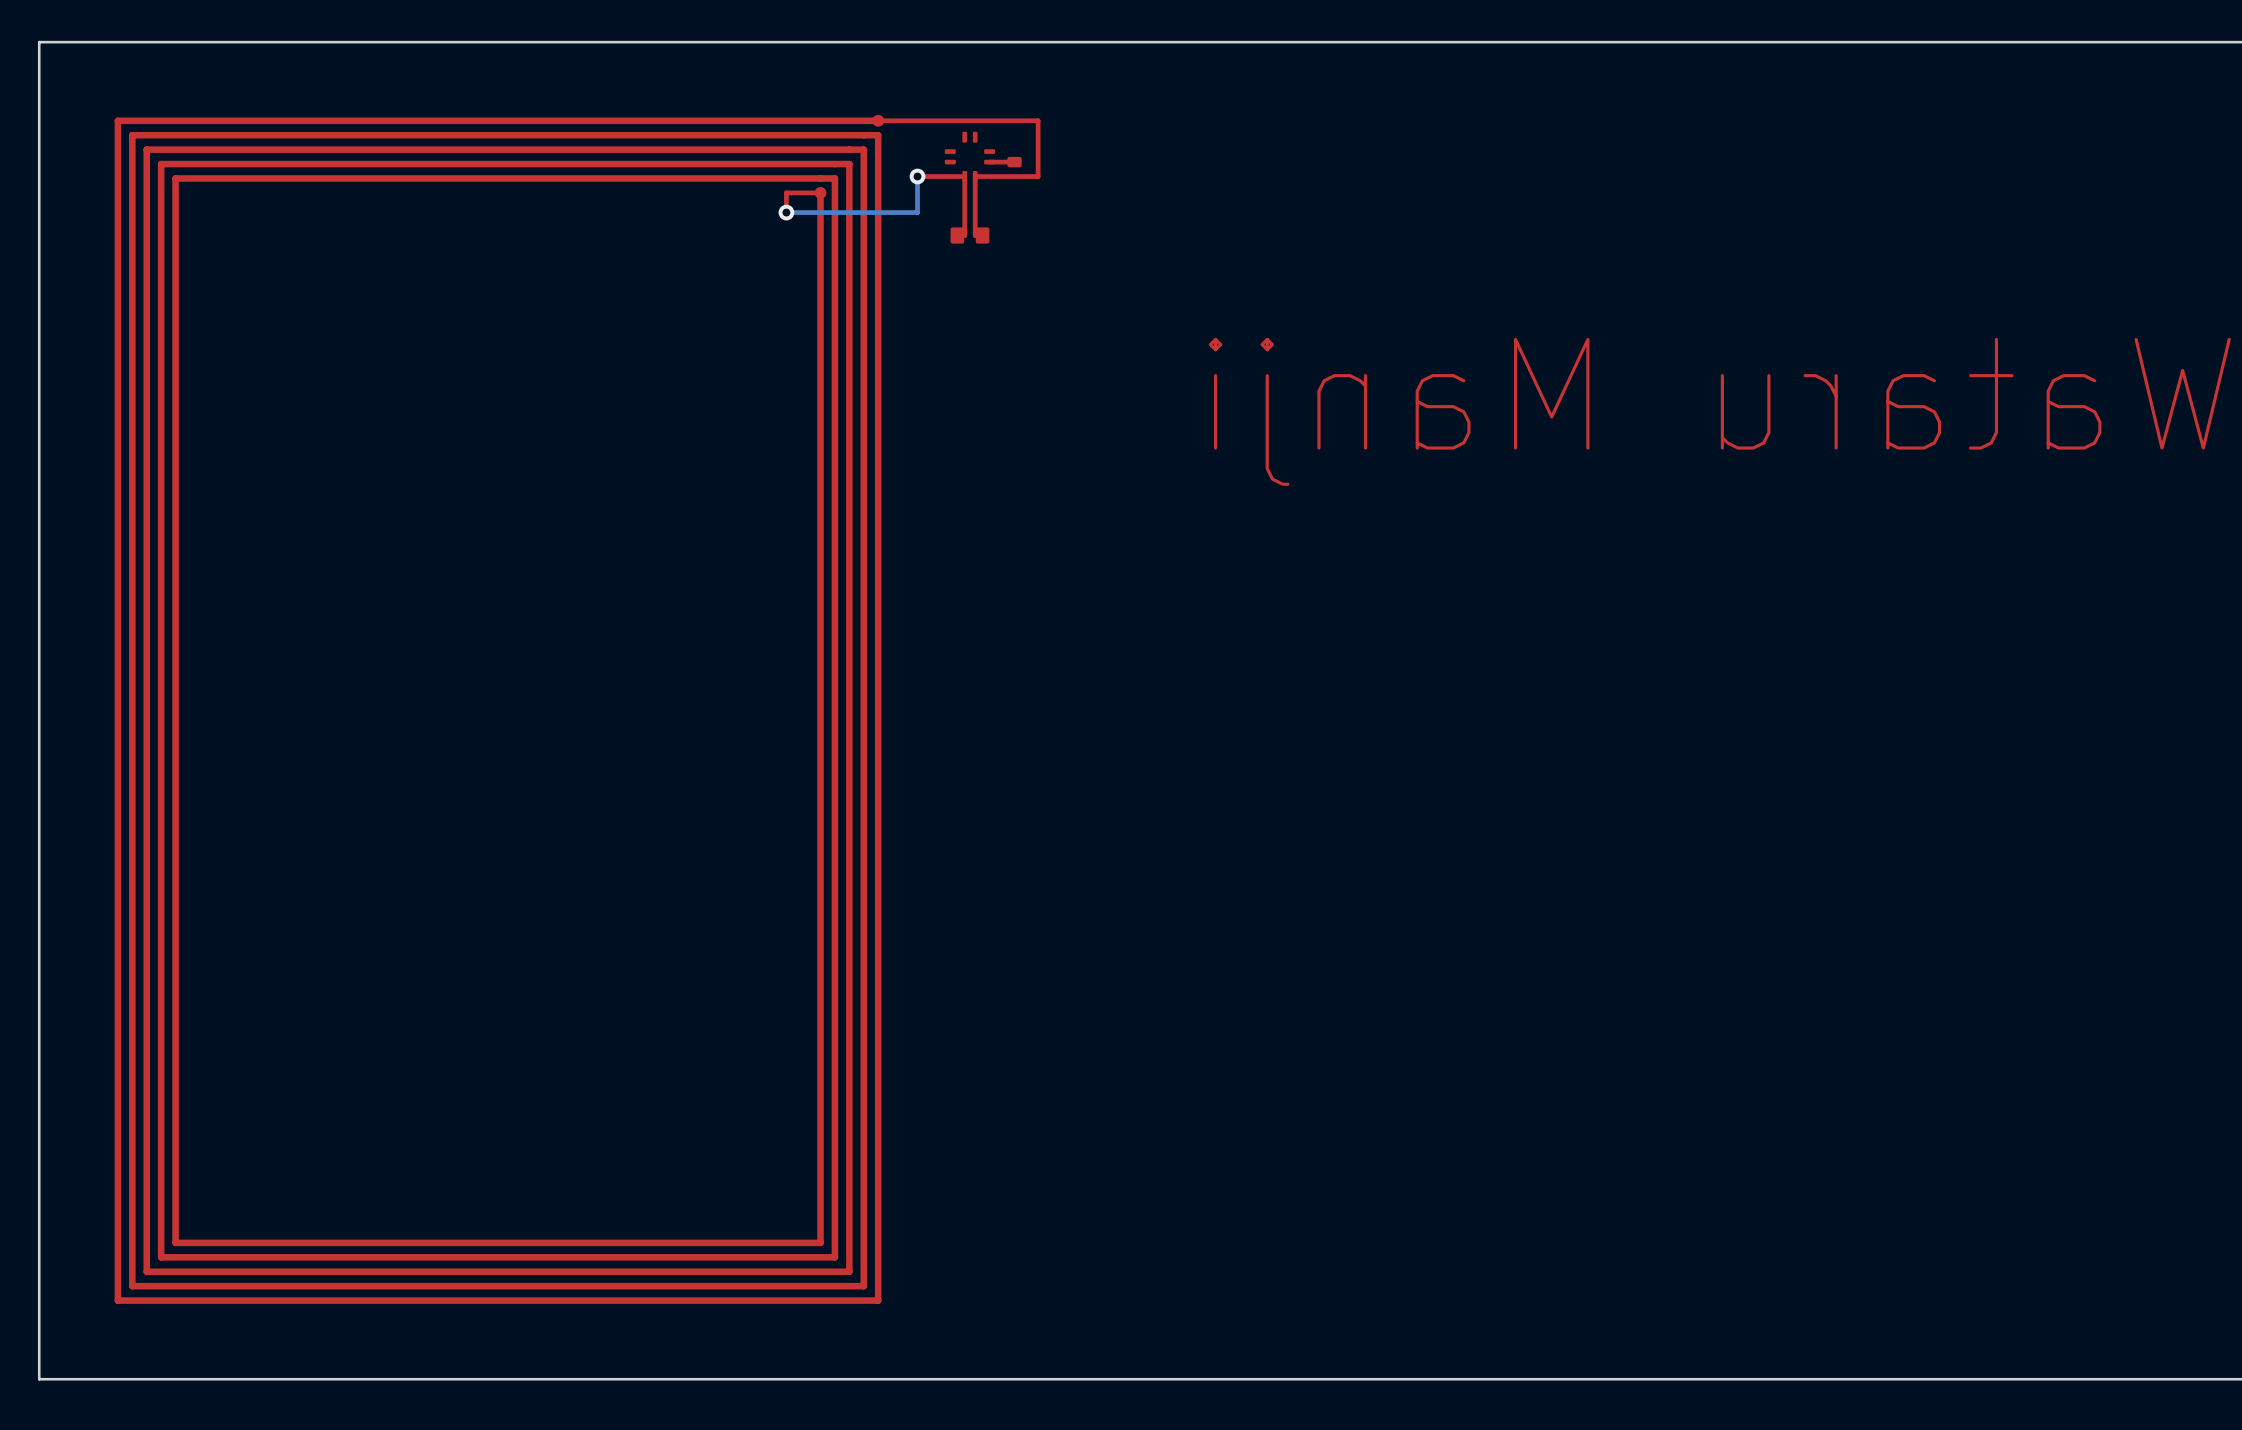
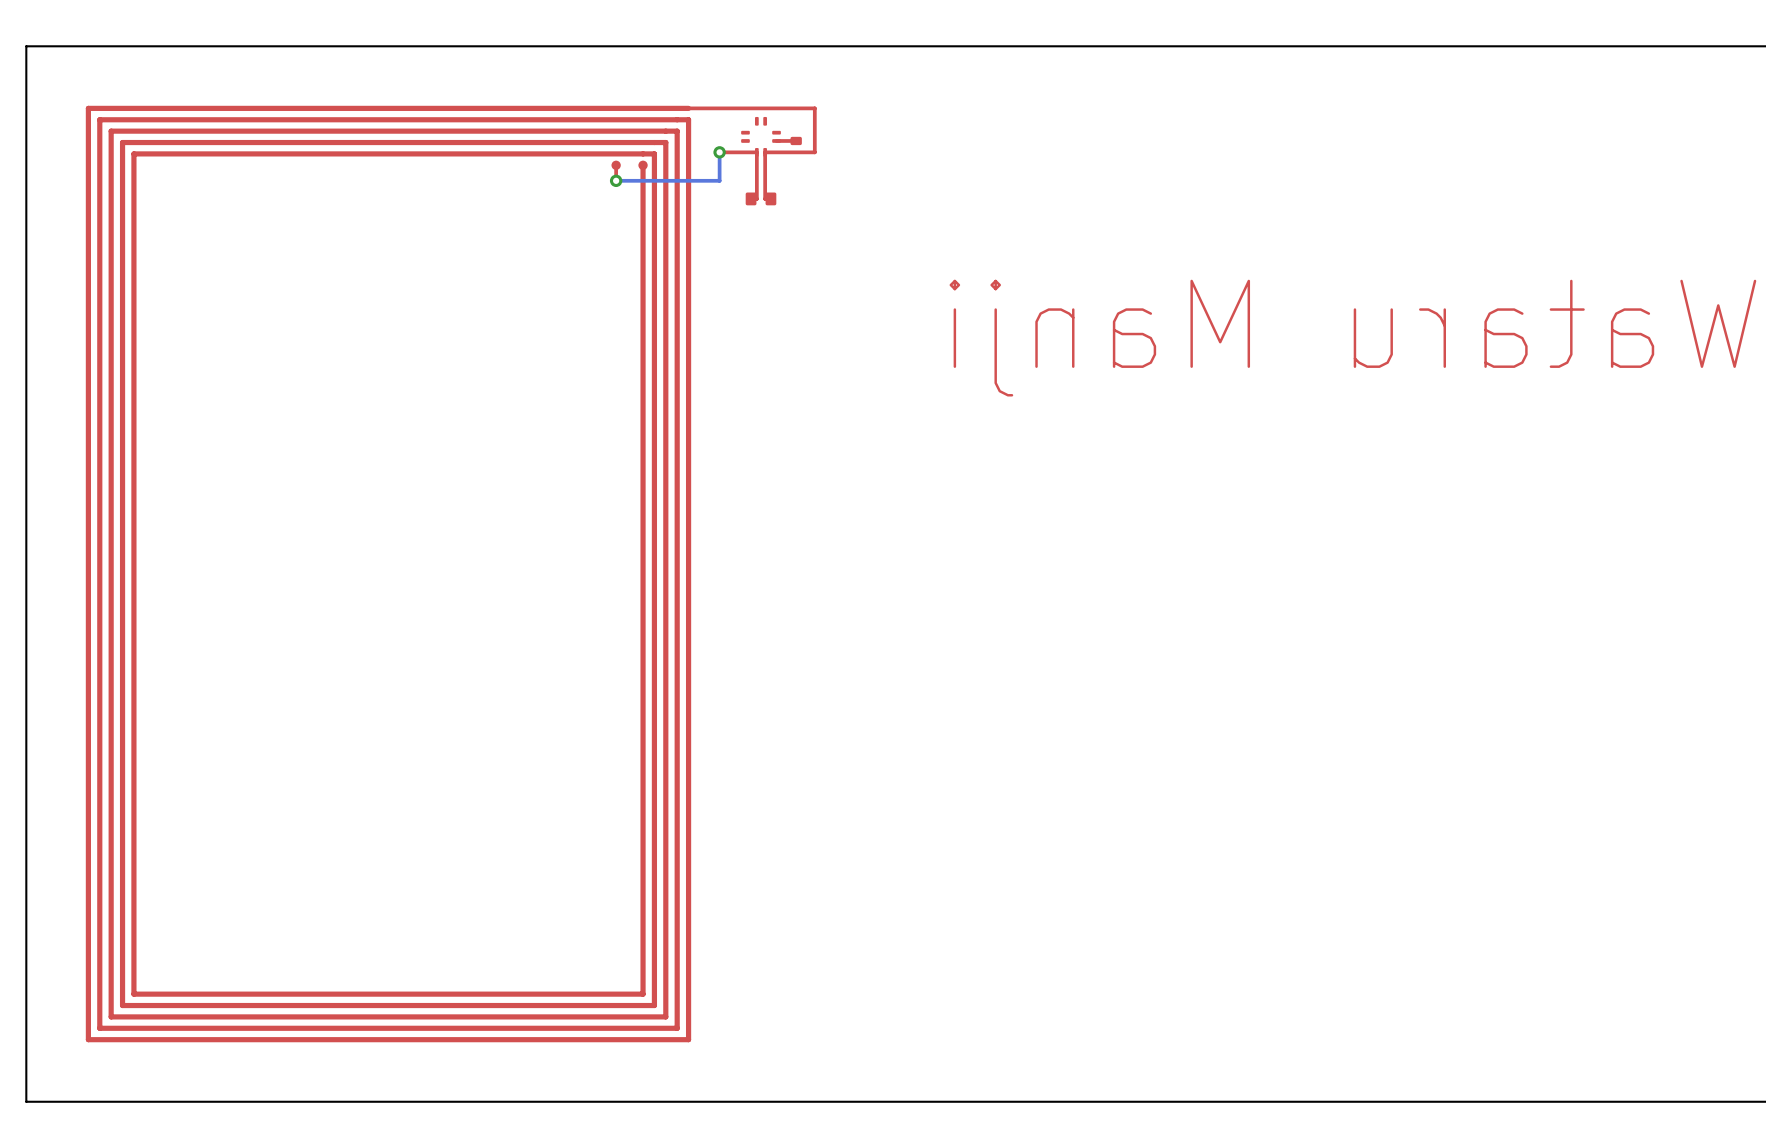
part: none -> (629, 165)
top track: (820, 192) (786, 192) -> (643, 165) (643, 994) (133, 994) (133, 153) (654, 153) (654, 1005) (122, 1005) (122, 142) (665, 142) (665, 1016) (111, 1016) (111, 131) (677, 131) (677, 1028) (99, 1028) (99, 119) (688, 119) (688, 1039) (88, 1039) (88, 108) (688, 108)
part: (499, 709) -> none

